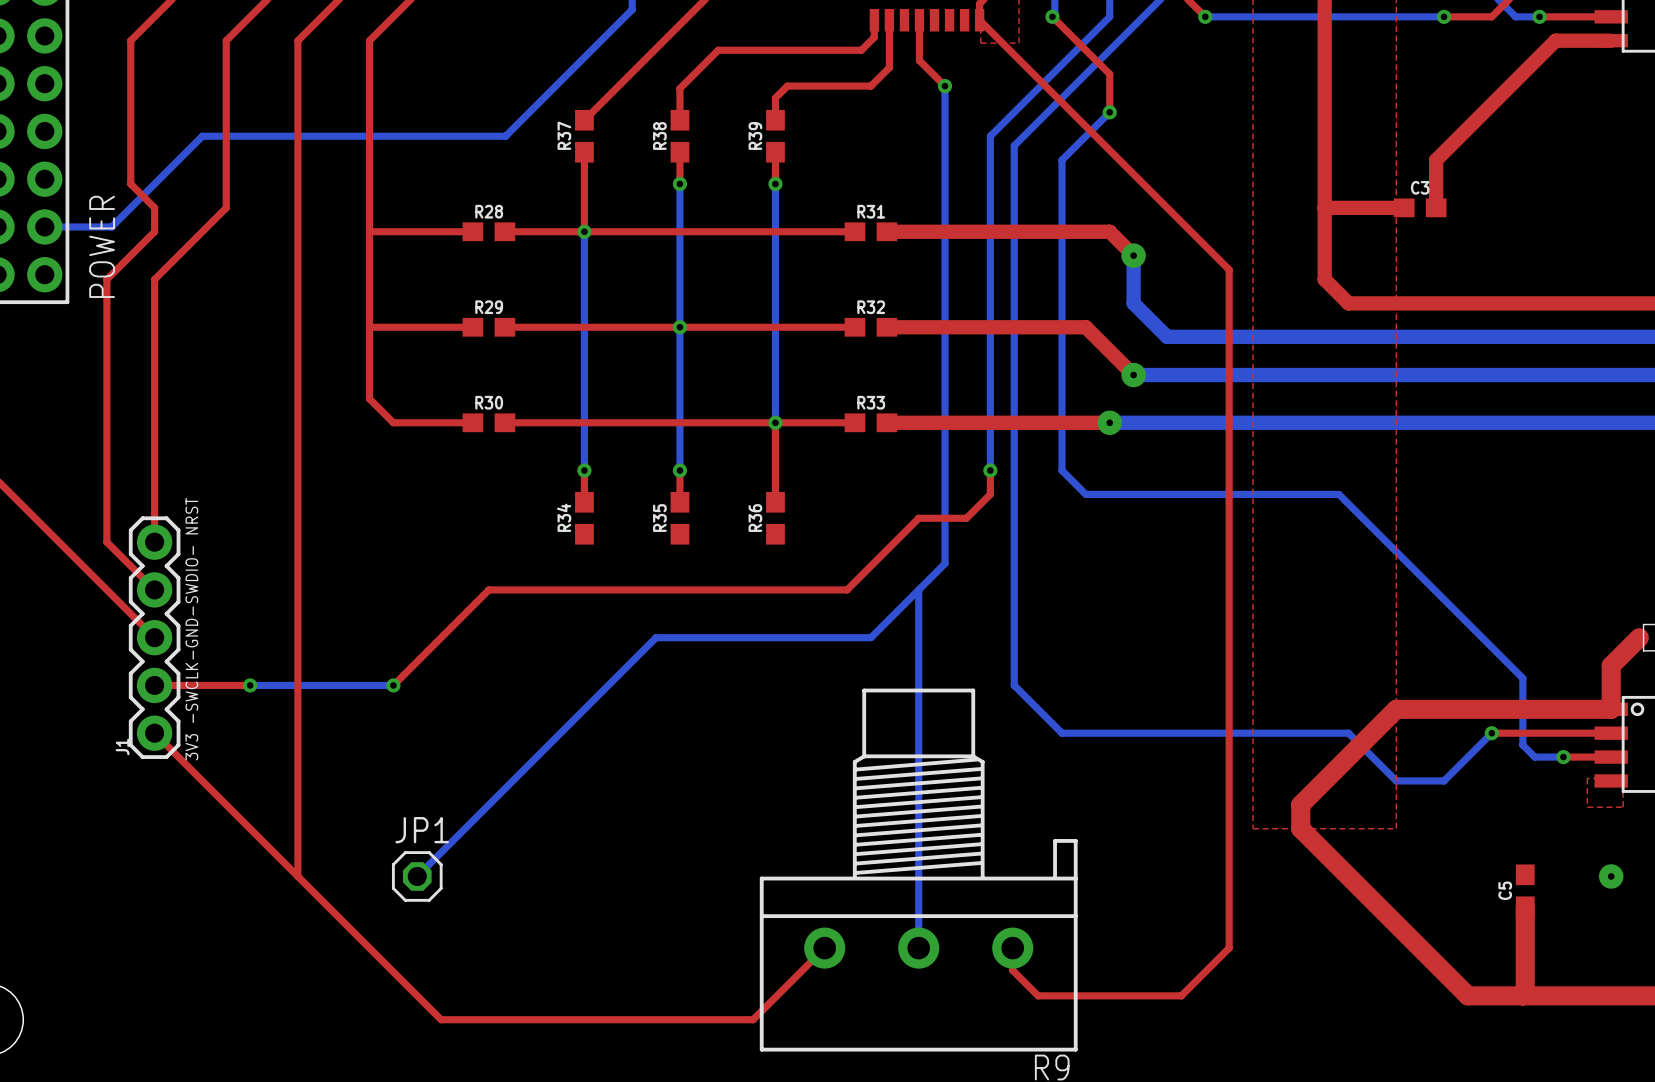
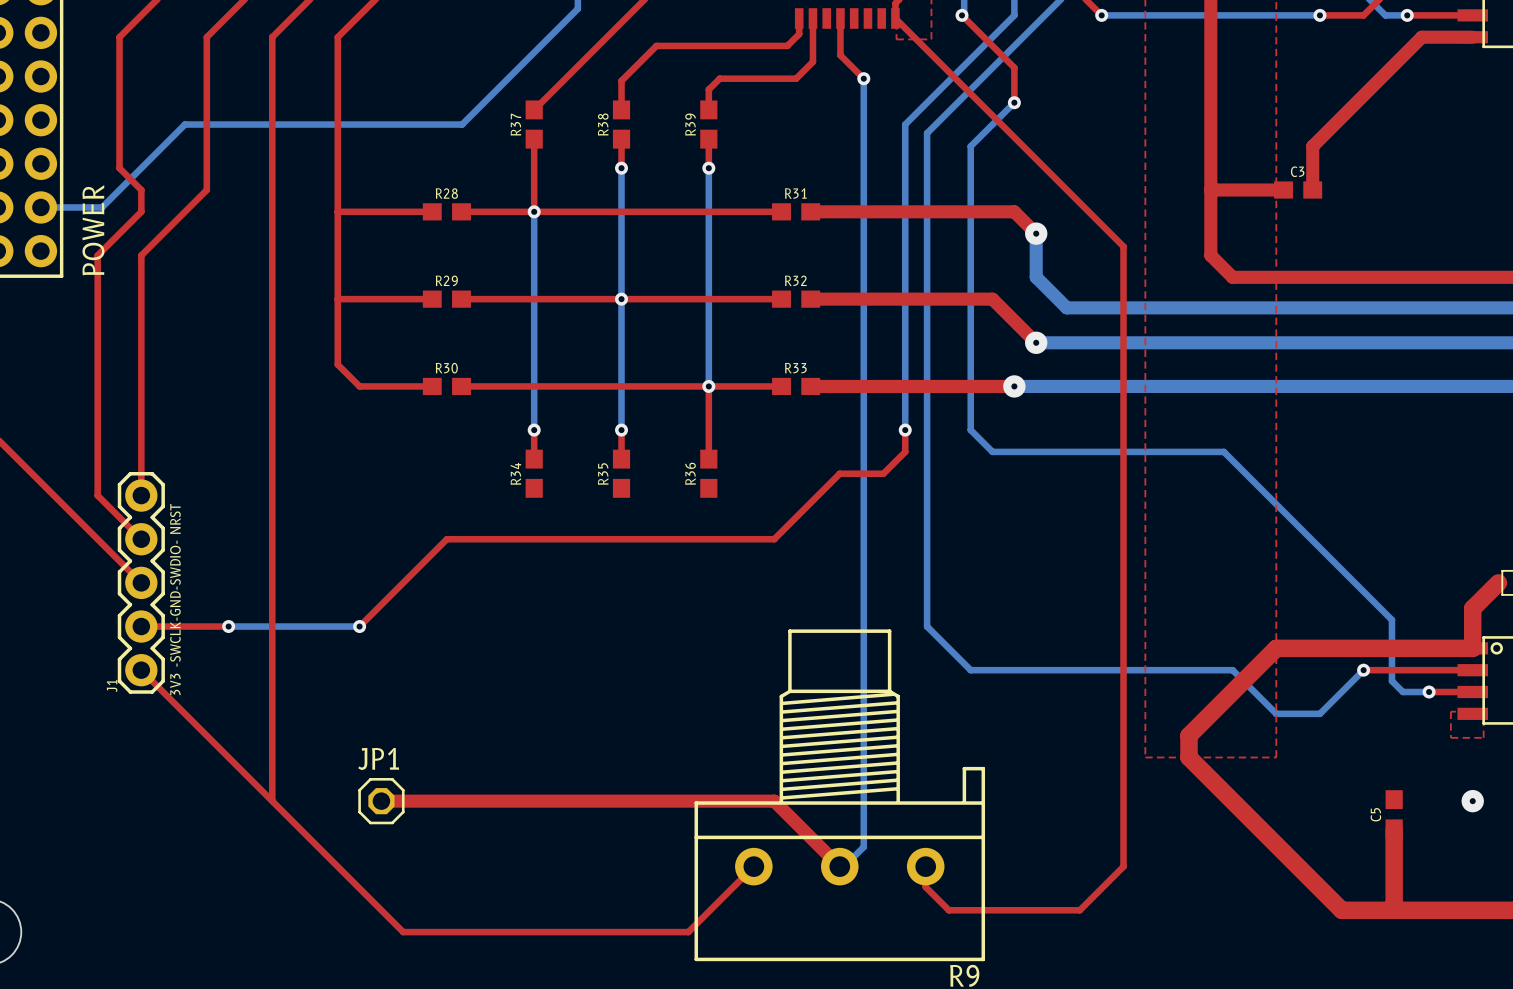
bottom track: (944, 563) (870, 637) (656, 637) (417, 876) -> none
bottom track: (918, 589) (918, 948) -> (863, 515) (863, 846) (844, 866) (839, 866)
top track: none -> (381, 801) (774, 801) (839, 866)

